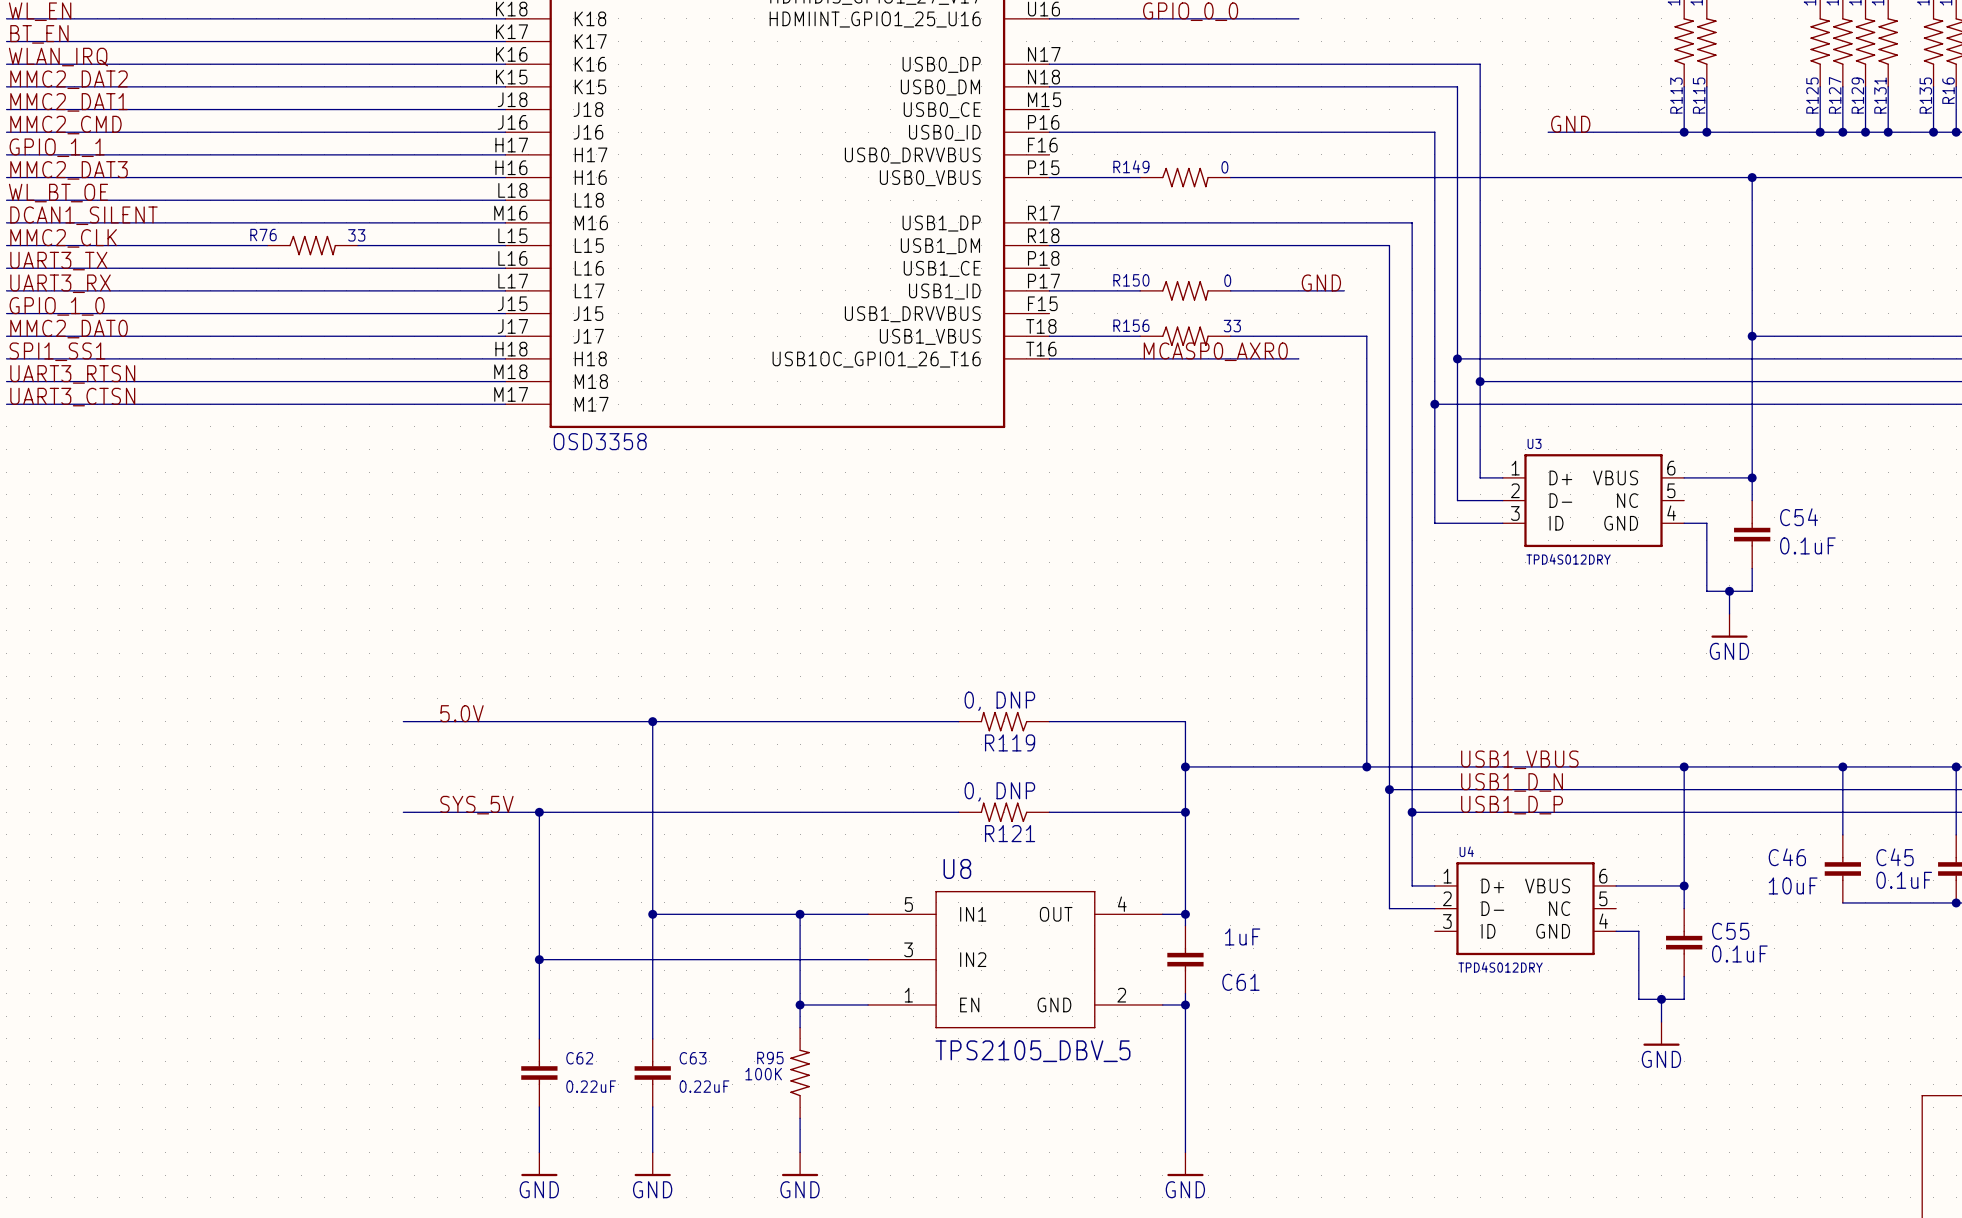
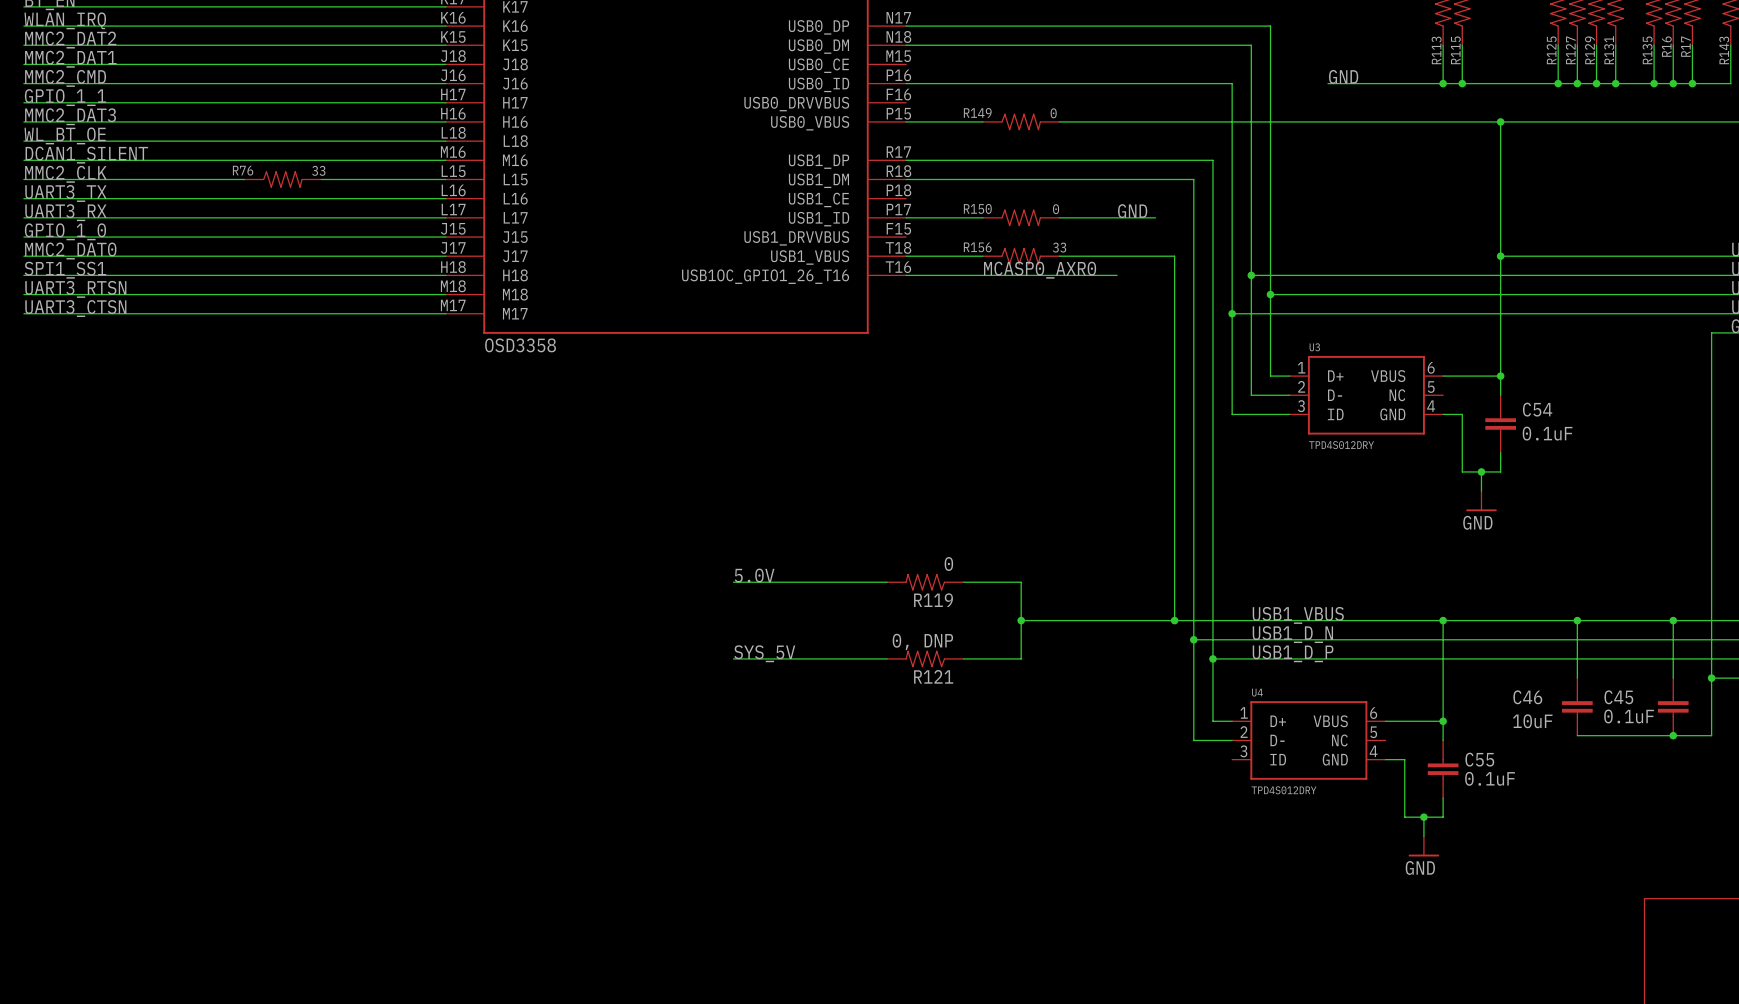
R119 value: 0, DNP (999, 701) -> 0 (948, 564)
label: 5.0V (462, 713) -> none
label: none -> 5.0V (754, 575)
wire: (403, 721) (845, 721) -> none
wire: (652, 721) (652, 1038) -> none
junction: (652, 721) -> none
R119 position: (1004, 721) -> (925, 582)
label: SYS_5V (476, 805) -> none
label: none -> SYS_5V (764, 653)
wire: (403, 812) (845, 812) -> none
wire: (539, 812) (539, 1038) -> none
junction: (539, 812) -> none
R121 position: (1004, 812) -> (925, 658)
wire: (1185, 812) (1185, 925) -> none
junction: (1185, 812) -> none
wire: (652, 914) (868, 914) -> none
junction: (652, 914) -> none
wire: (800, 914) (800, 1027) -> none
junction: (800, 914) -> none
wire: (1162, 914) (1185, 914) -> none
junction: (1185, 914) -> none
wire: (539, 959) (868, 959) -> none
junction: (539, 959) -> none
U8: TPS2105_DBV_5 (1015, 959) -> none
C61: 1uF (1185, 959) -> none
wire: (1185, 993) (1185, 1152) -> none
wire: (800, 1004) (868, 1004) -> none
junction: (800, 1004) -> none
wire: (1162, 1004) (1185, 1004) -> none
junction: (1185, 1004) -> none
C62: 0.22uF (539, 1072) -> none
C63: 0.22uF (652, 1072) -> none
R95: 100K (800, 1072) -> none
wire: (539, 1107) (539, 1152) -> none
wire: (652, 1107) (652, 1152) -> none
wire: (800, 1118) (800, 1152) -> none
power symbol: GND (539, 1164) -> none
power symbol: GND (652, 1164) -> none
power symbol: GND (800, 1164) -> none
power symbol: GND (1185, 1164) -> none

